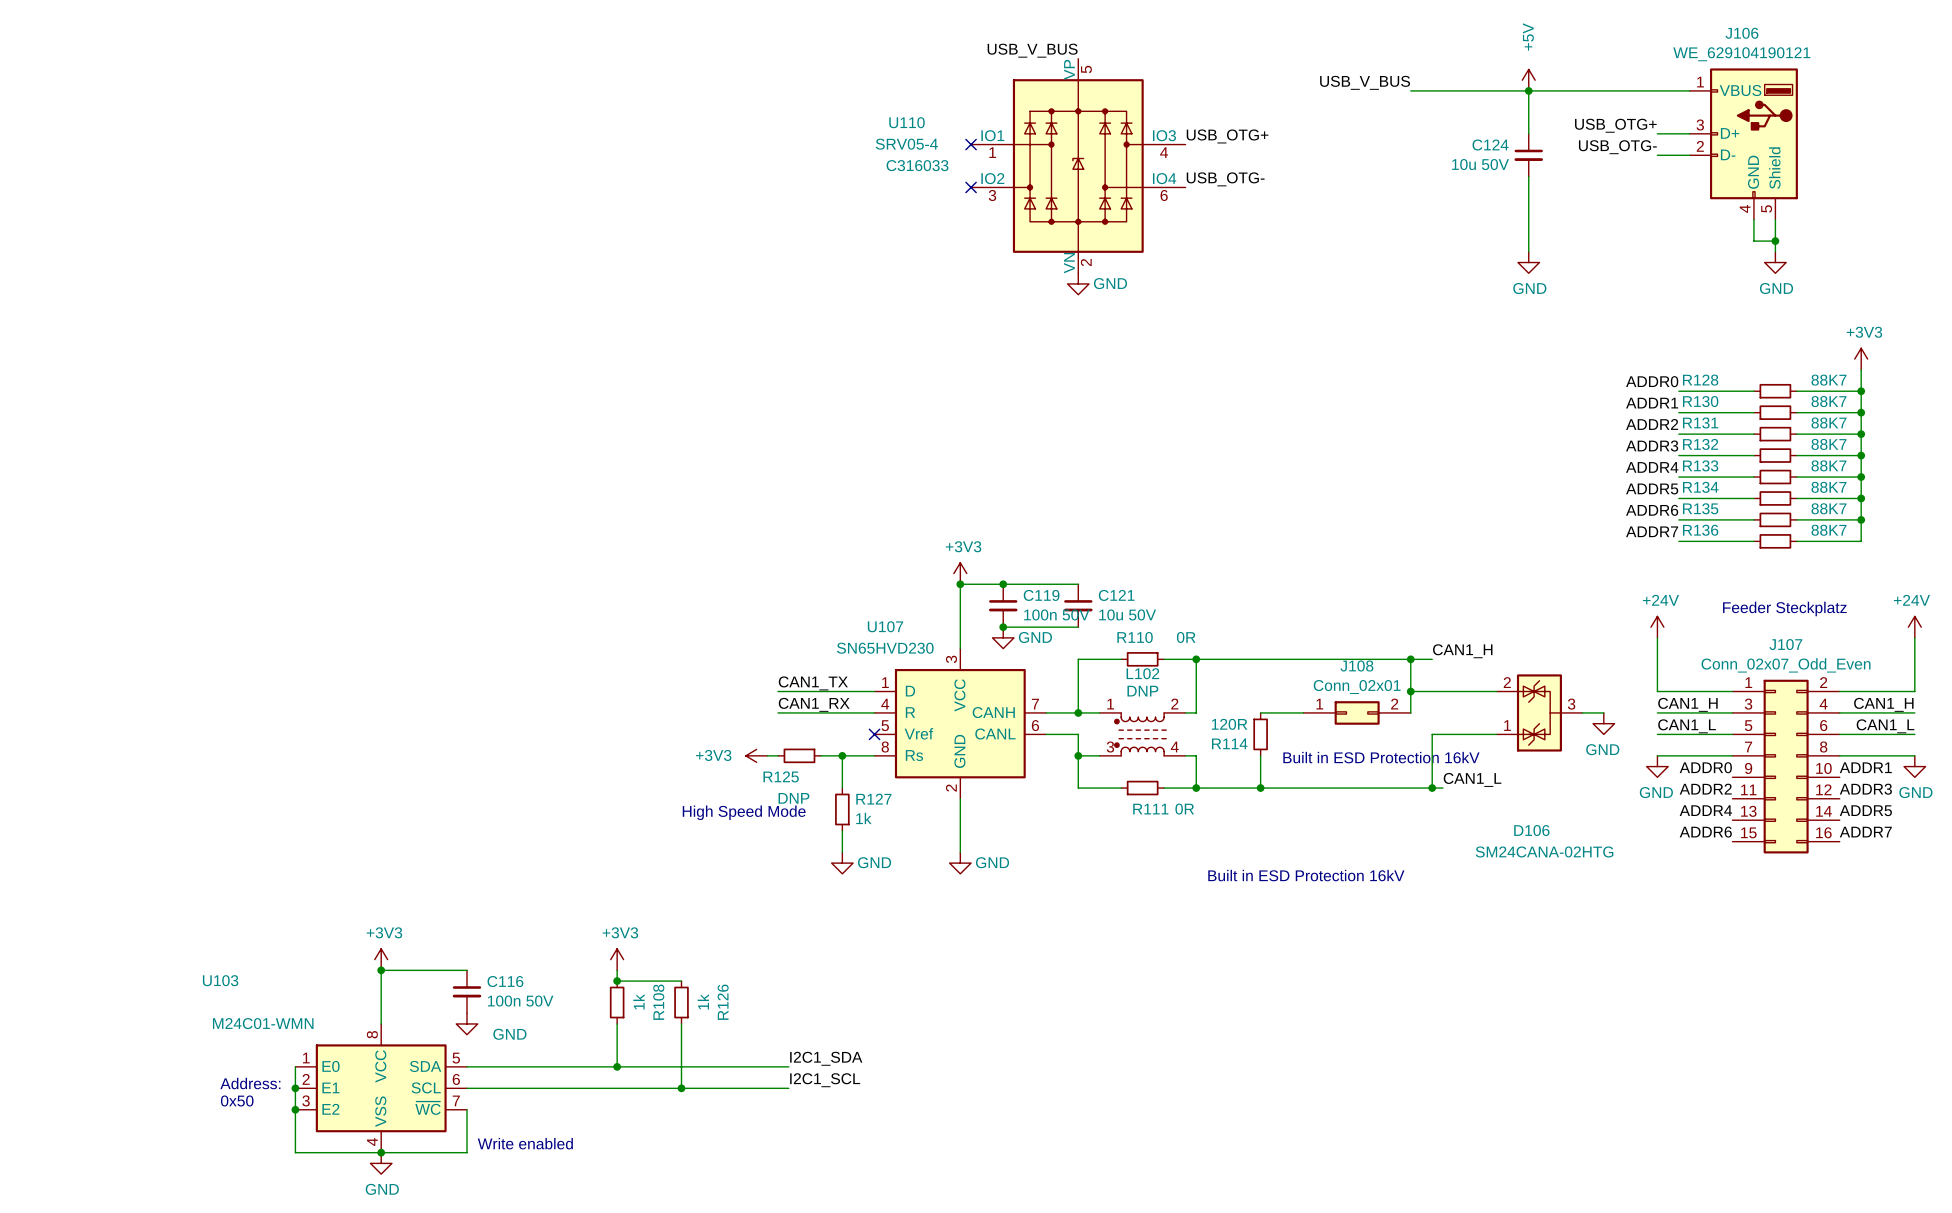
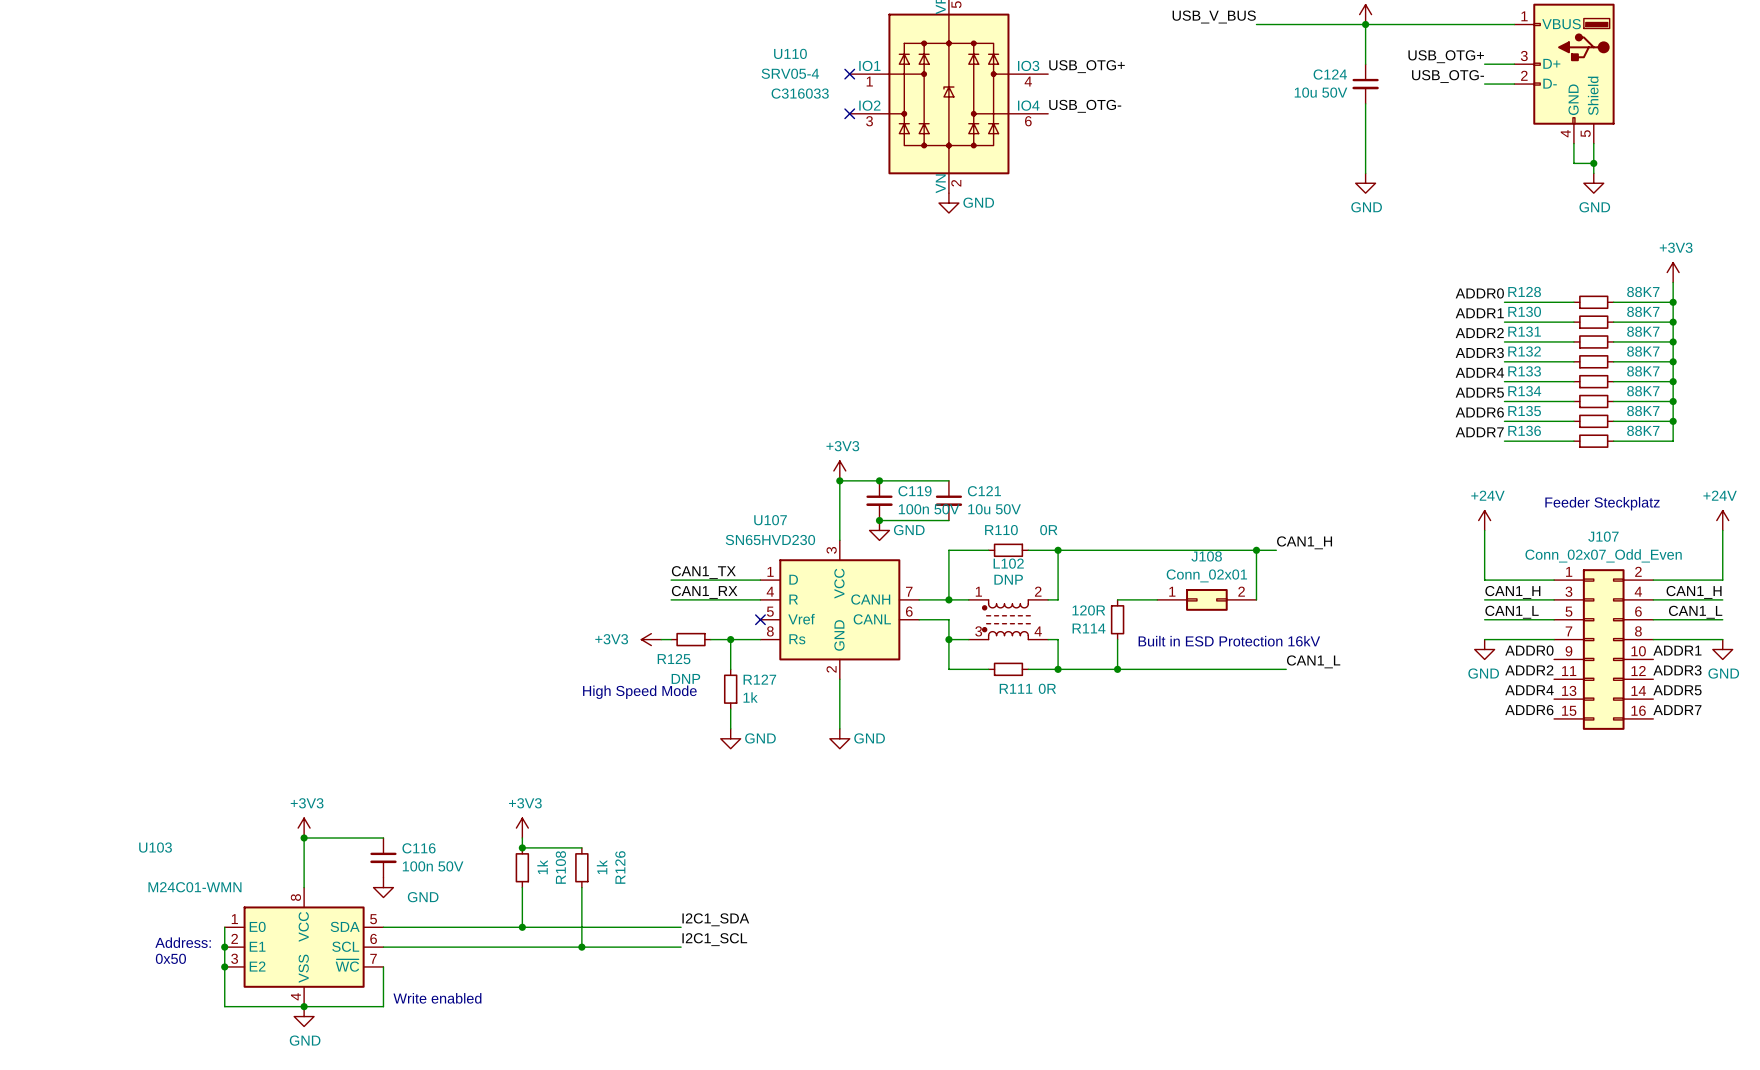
wire: (1410, 691) (1496, 691) -> none
junction: (1410, 691) -> none
D106: SM24CANA-02HTG (1539, 712) -> none
wire: (1582, 712) (1603, 712) -> none
power symbol: GND (1603, 723) -> none
wire: (1496, 734) (1432, 734) (1432, 788) -> none
junction: (1432, 788) -> none
text: Built in ESD Protection 16kV (1306, 875) -> none

